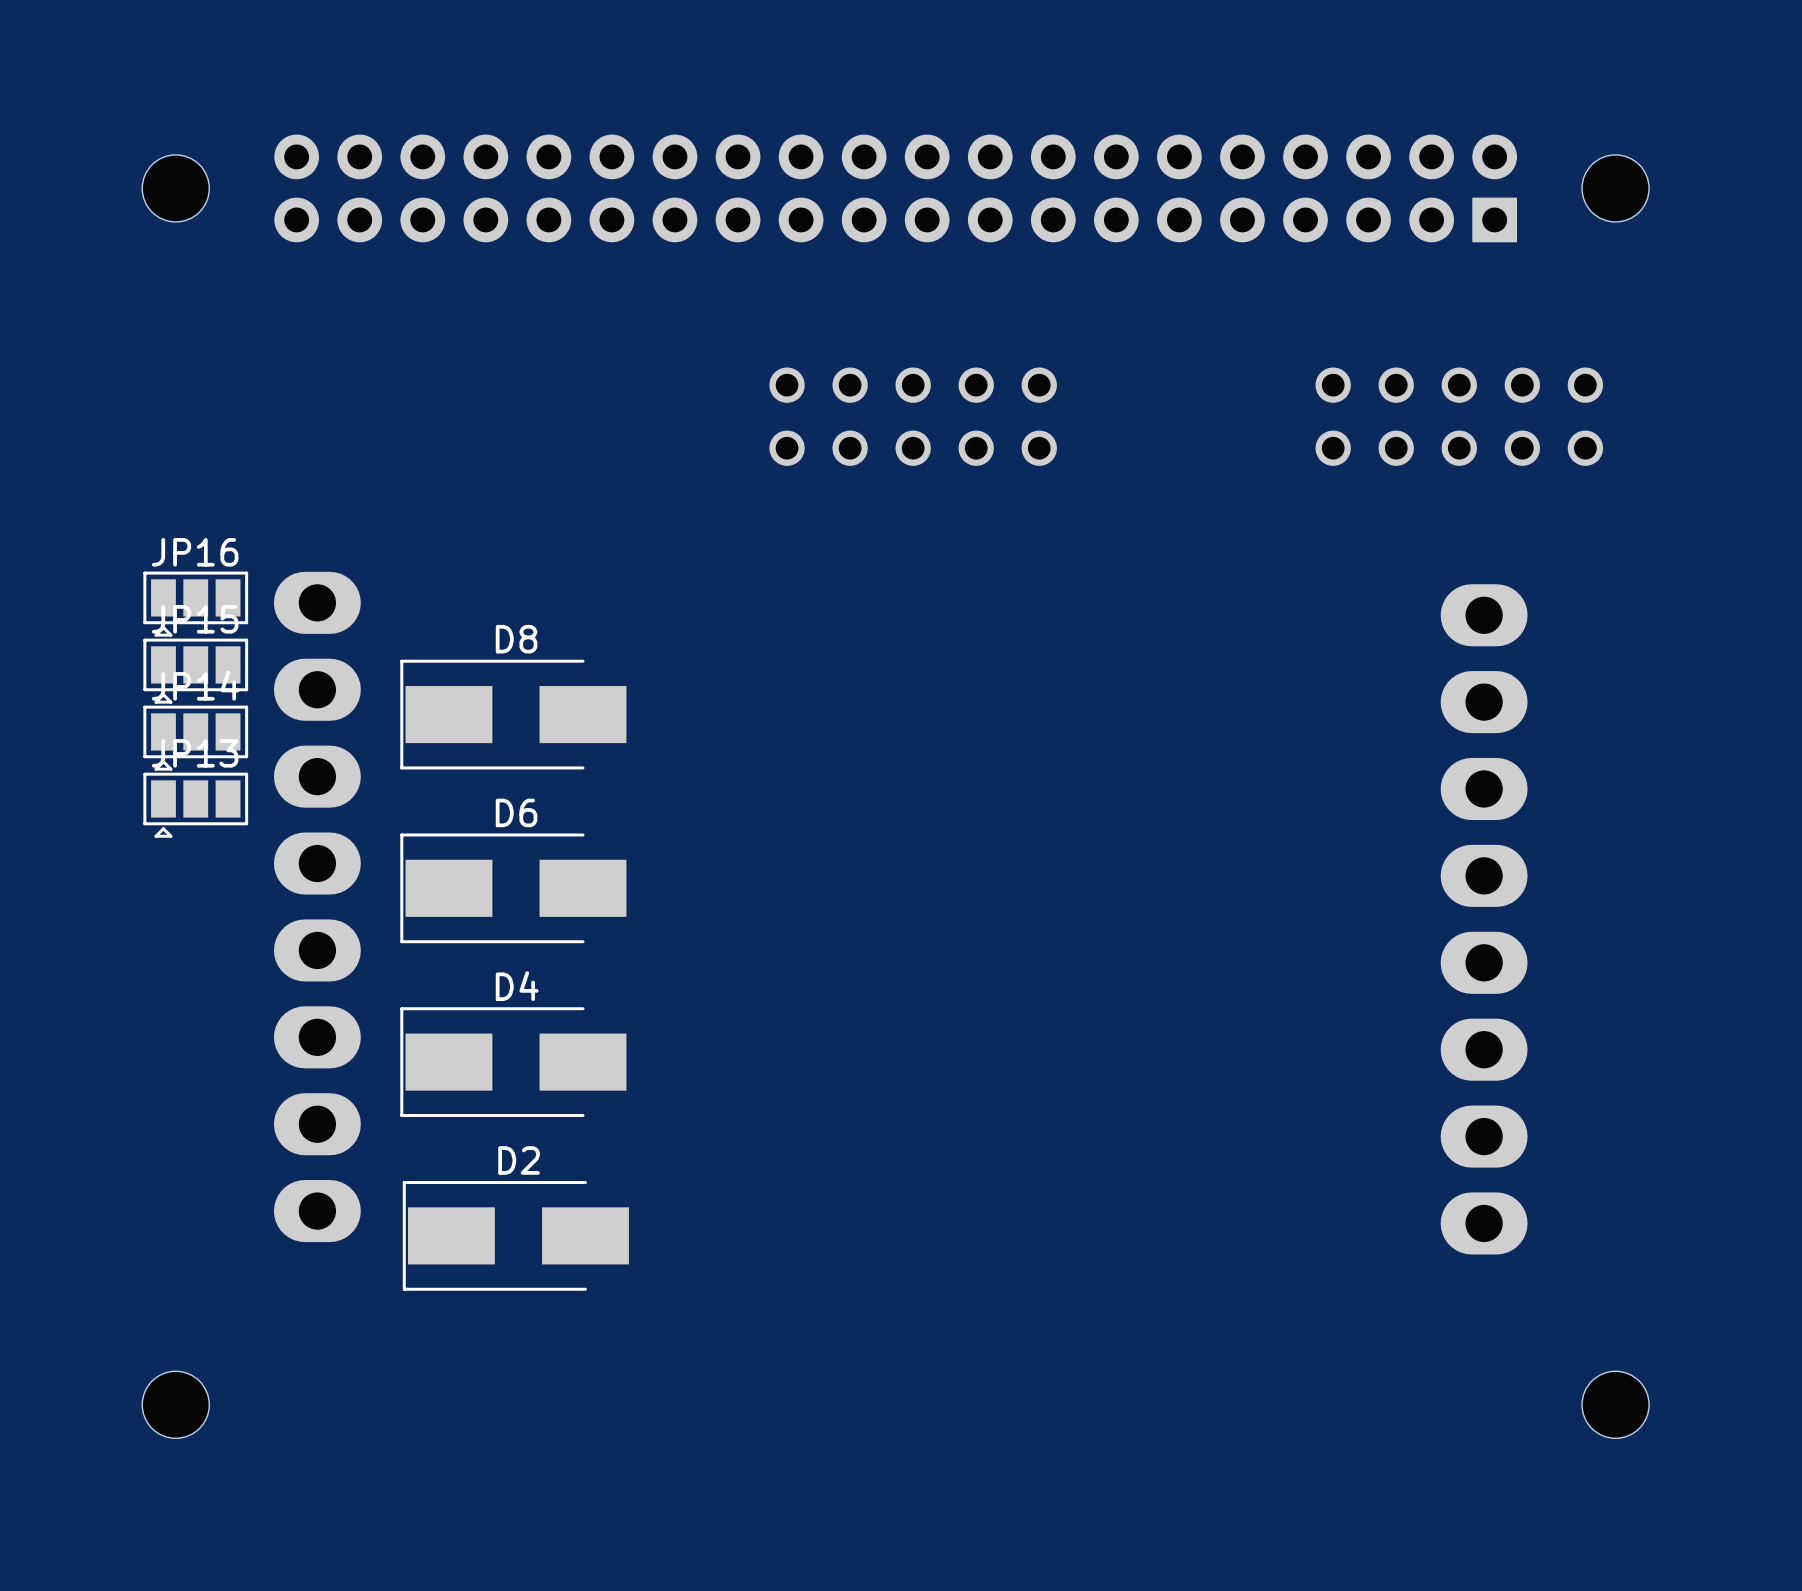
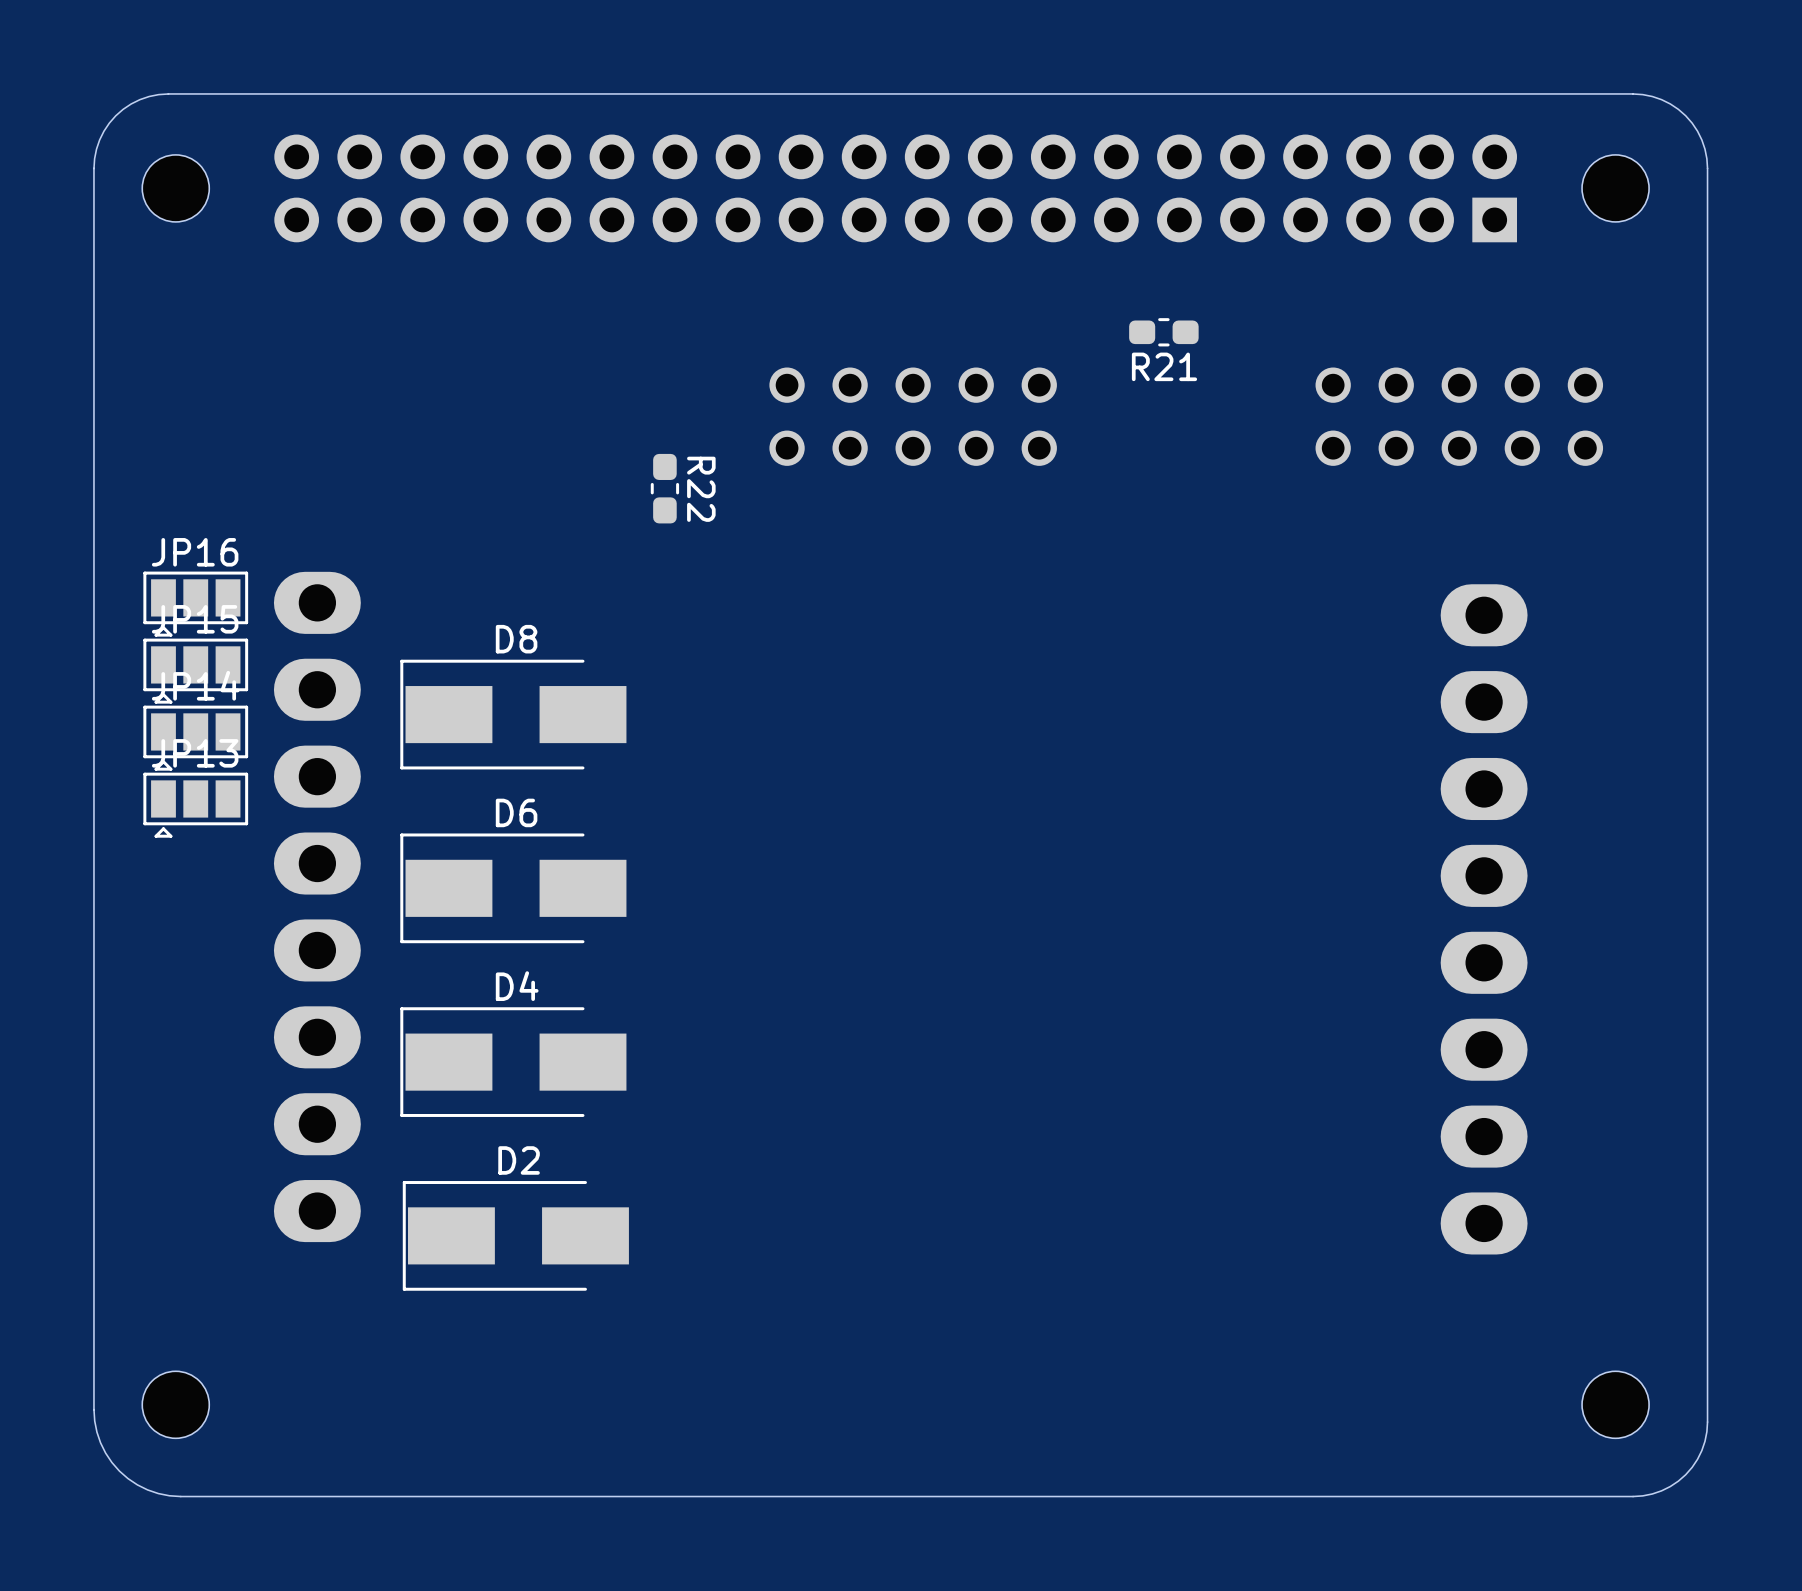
board edge: none -> (1633, 93) (168, 93) (139, 99) (115, 115) (99, 139) (93, 168) (93, 1409) (100, 1442) (119, 1471) (147, 1489) (180, 1496) (1633, 1496) (1661, 1490) (1685, 1474) (1701, 1450) (1707, 1422) (1707, 168) (1701, 139) (1685, 115) (1661, 99) (1633, 93)
R21: none -> (1163, 332)
R22: none -> (664, 488)

